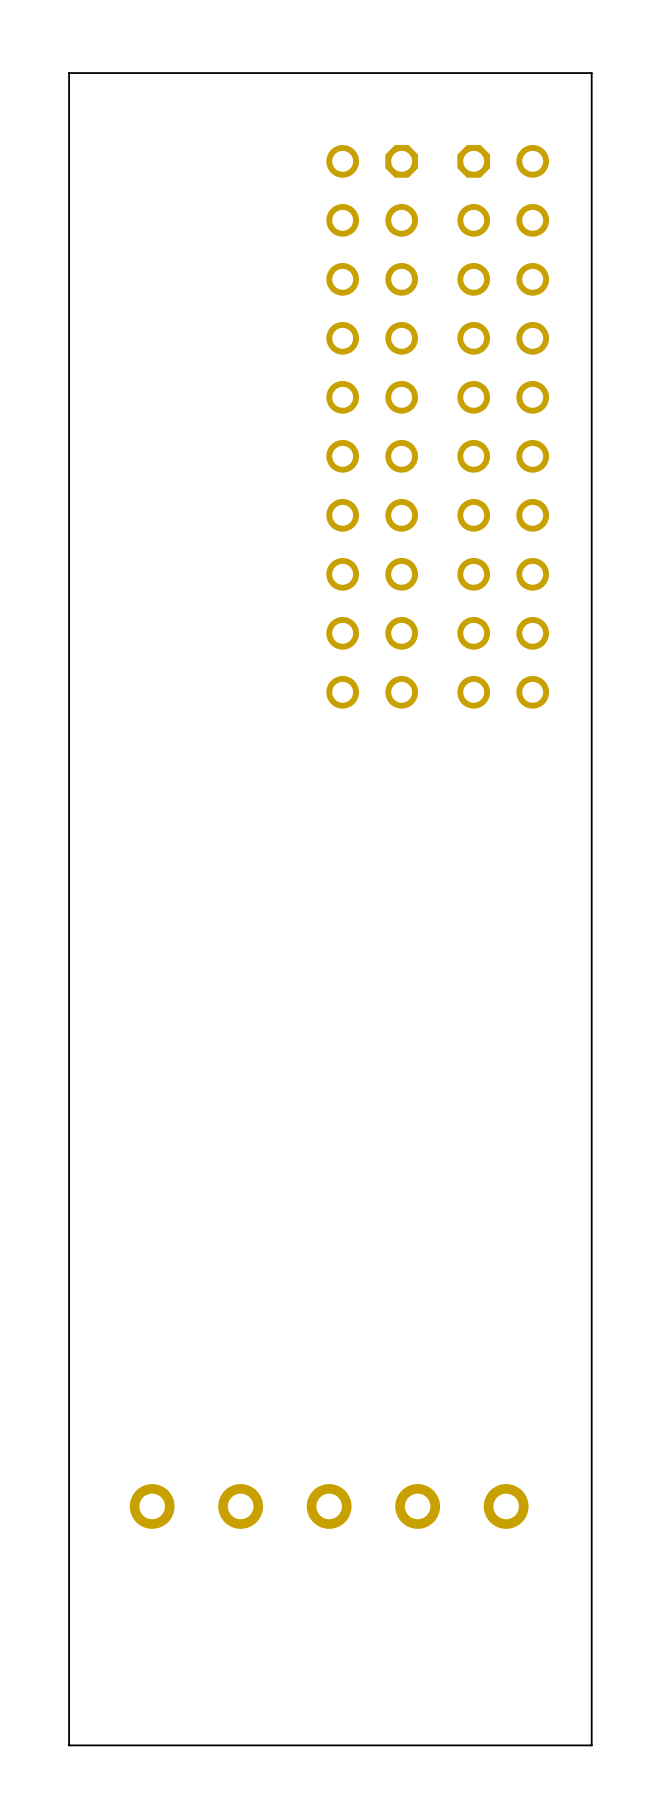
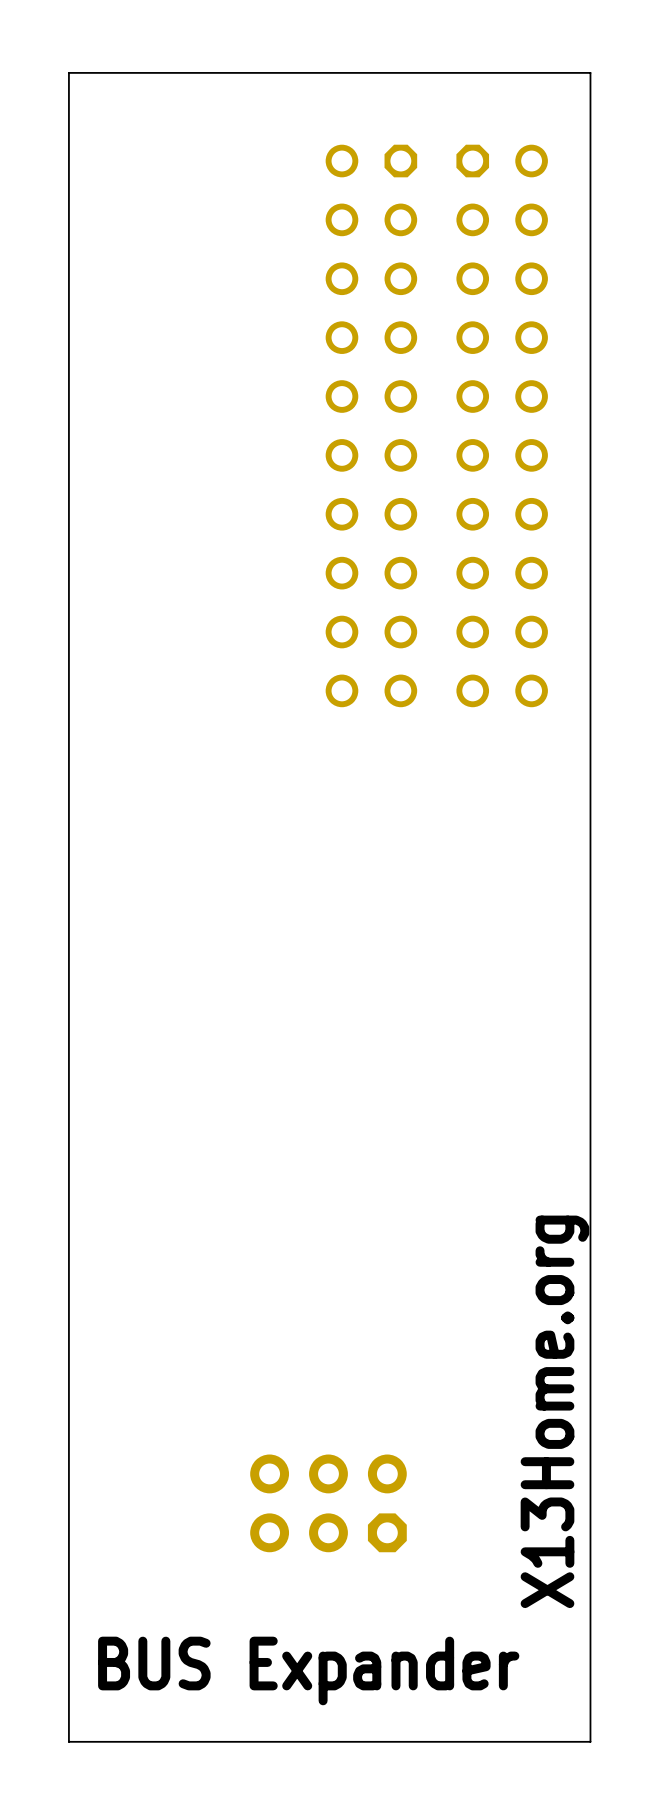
text: none -> X13Home.org (554, 1411)
part footprint: [129, 1484, 529, 1529] -> [250, 1454, 407, 1553]
text: none -> BUS Expander (308, 1670)

